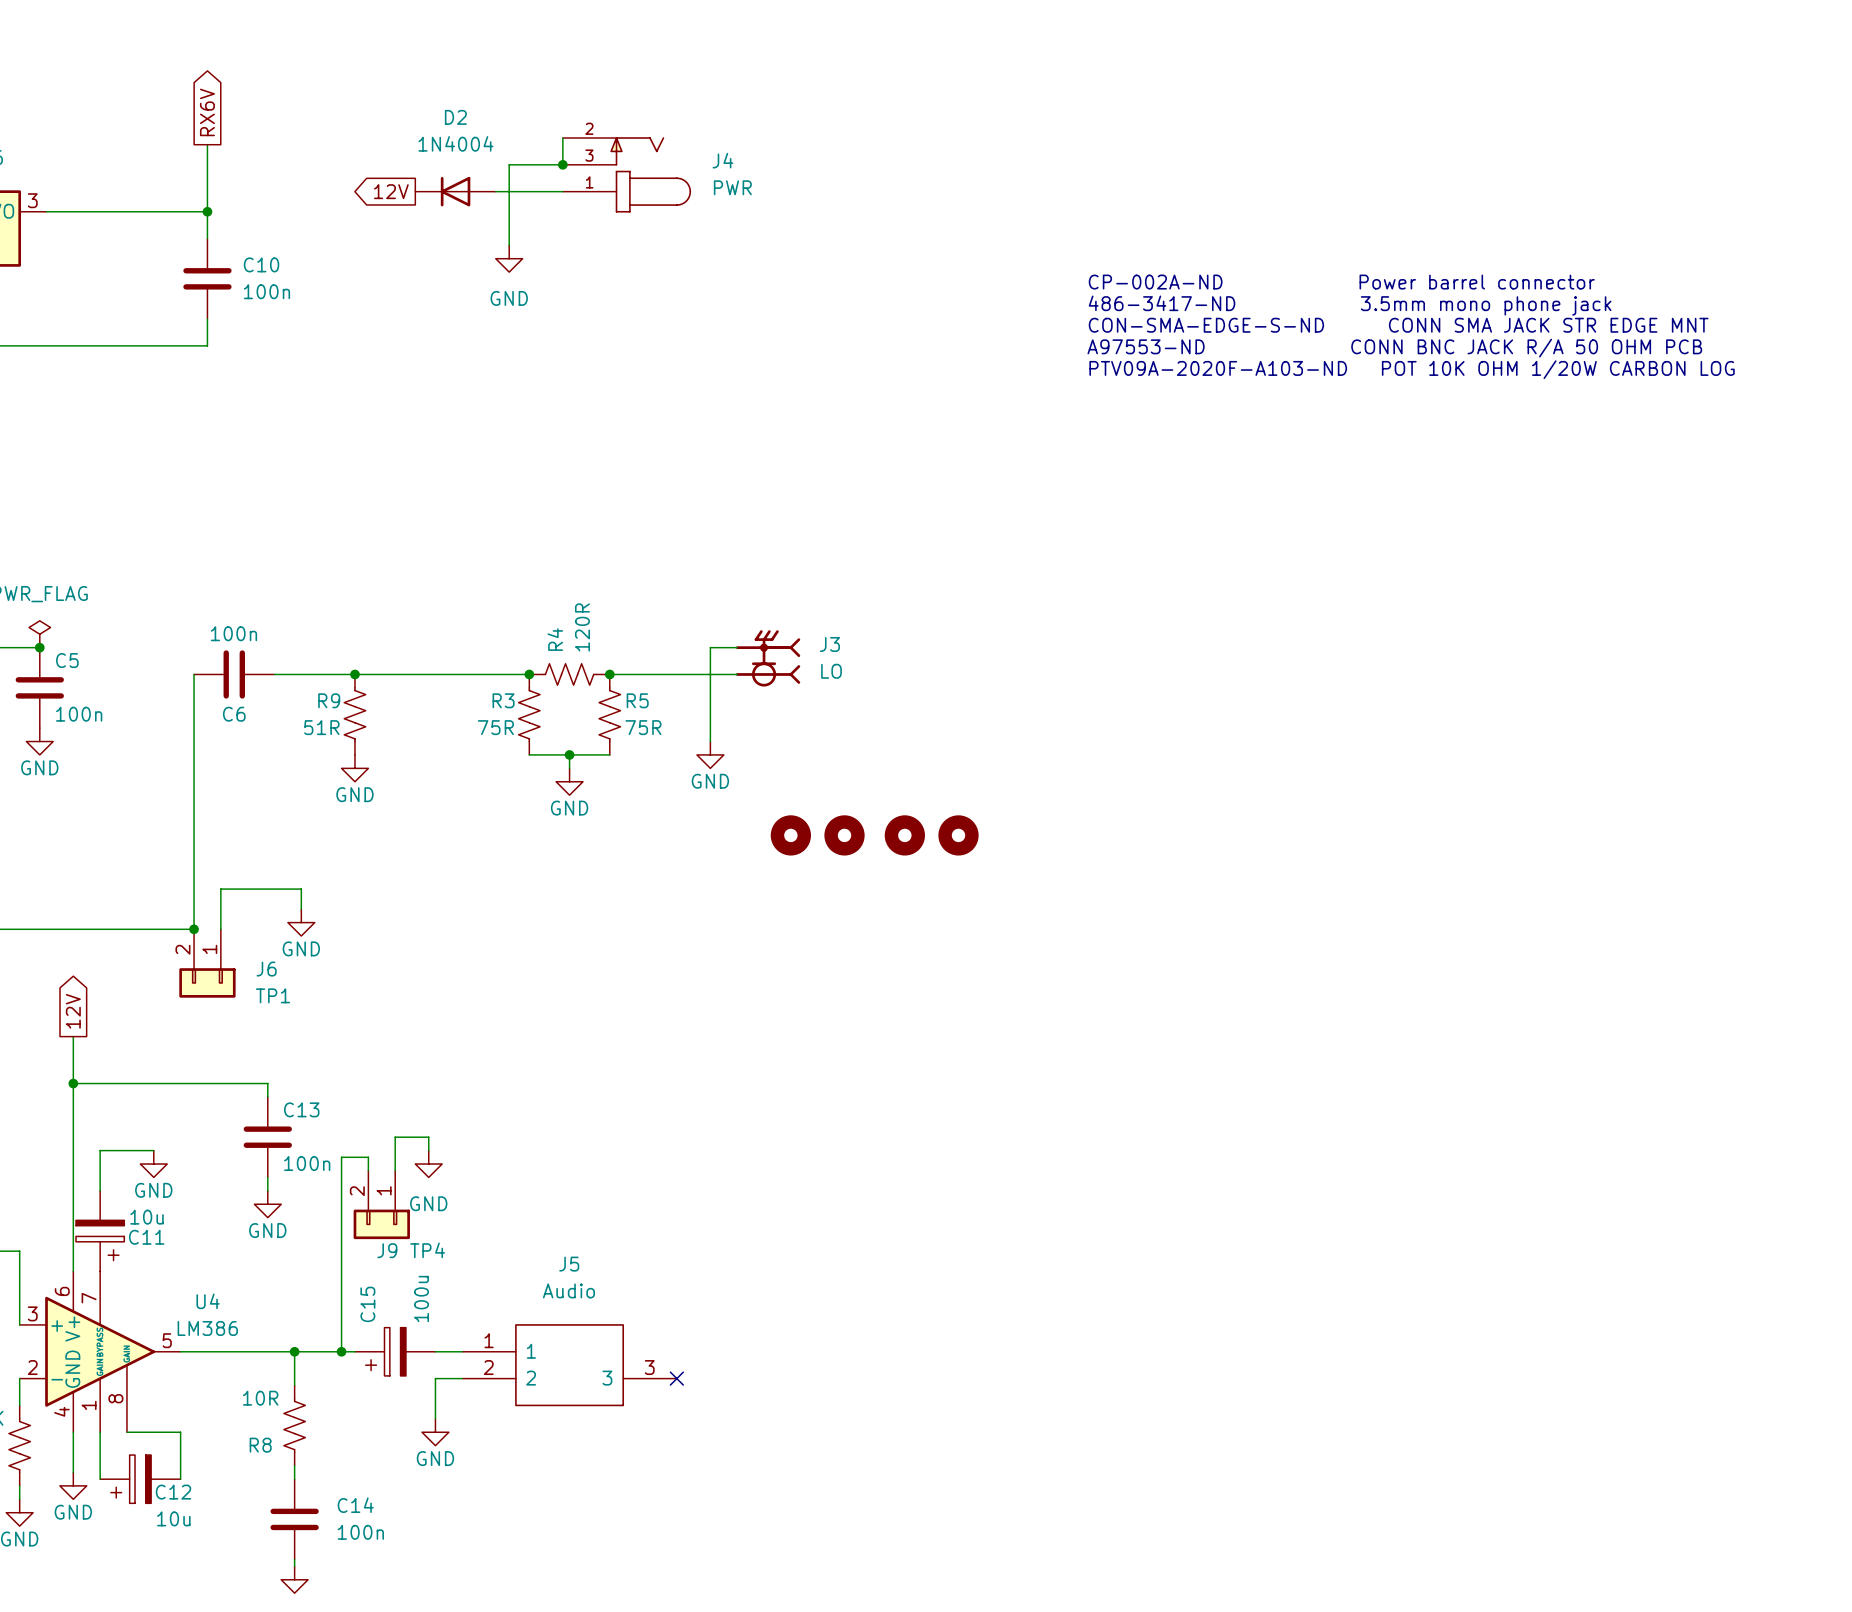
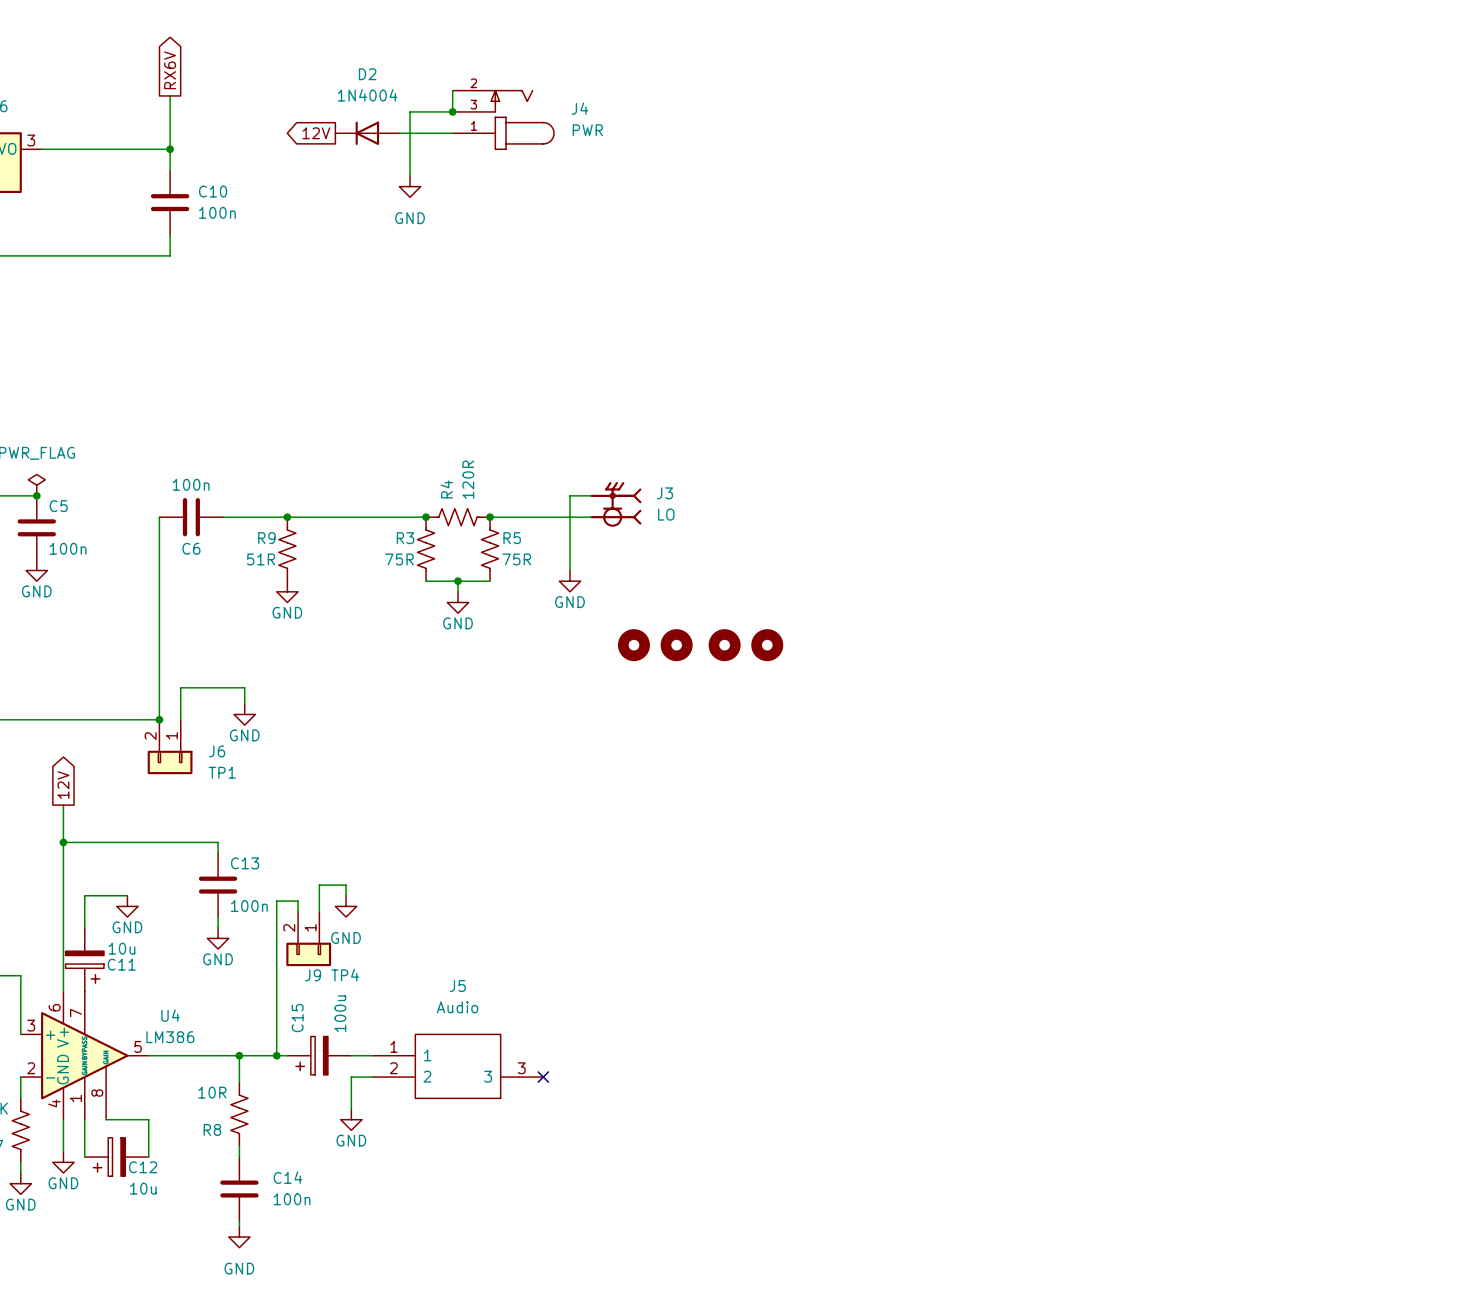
text: CP-002A-ND Power barrel connector (1341, 282) -> none
text: 486-3417-ND 3.5mm mono phone jack (1350, 305) -> none
text: CON-SMA-EDGE-S-ND CONN SMA JACK STR EDGE MNT (1398, 325) -> none
text: A97553-ND CONN BNC JACK R/A 50 OHM PCB (1394, 348) -> none
text: PTV09A-2020F-A103-ND POT 10K OHM 1/20W CARBON LOG (1412, 369) -> none

